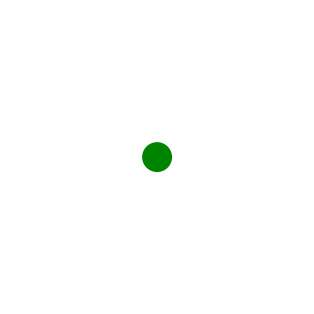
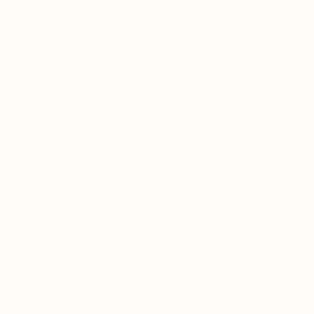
junction: (157, 157) -> none

